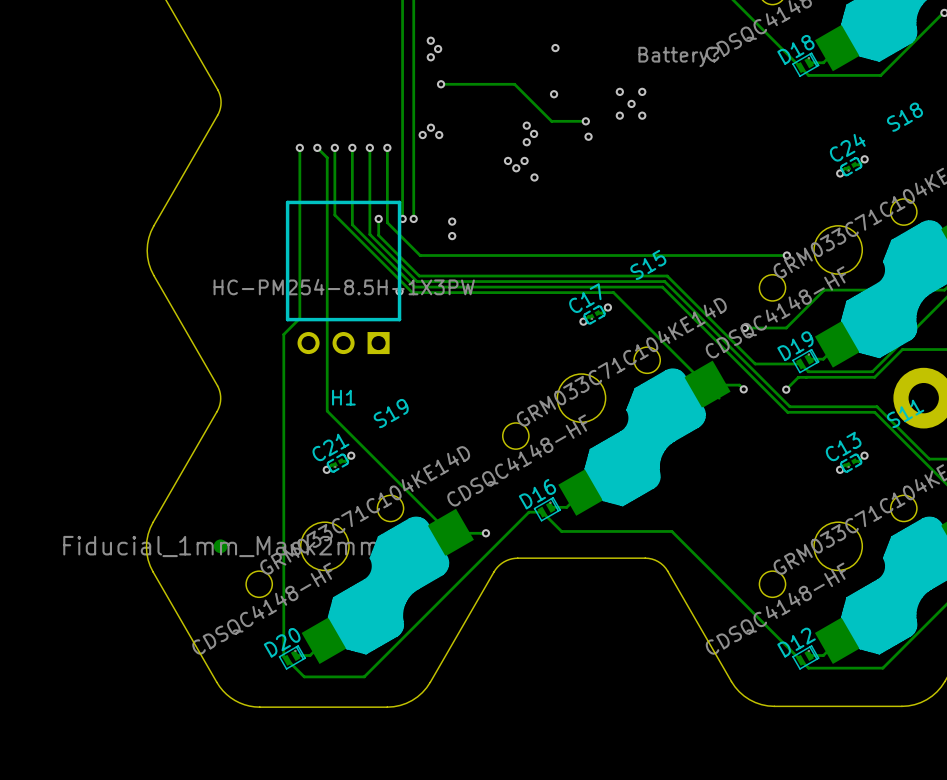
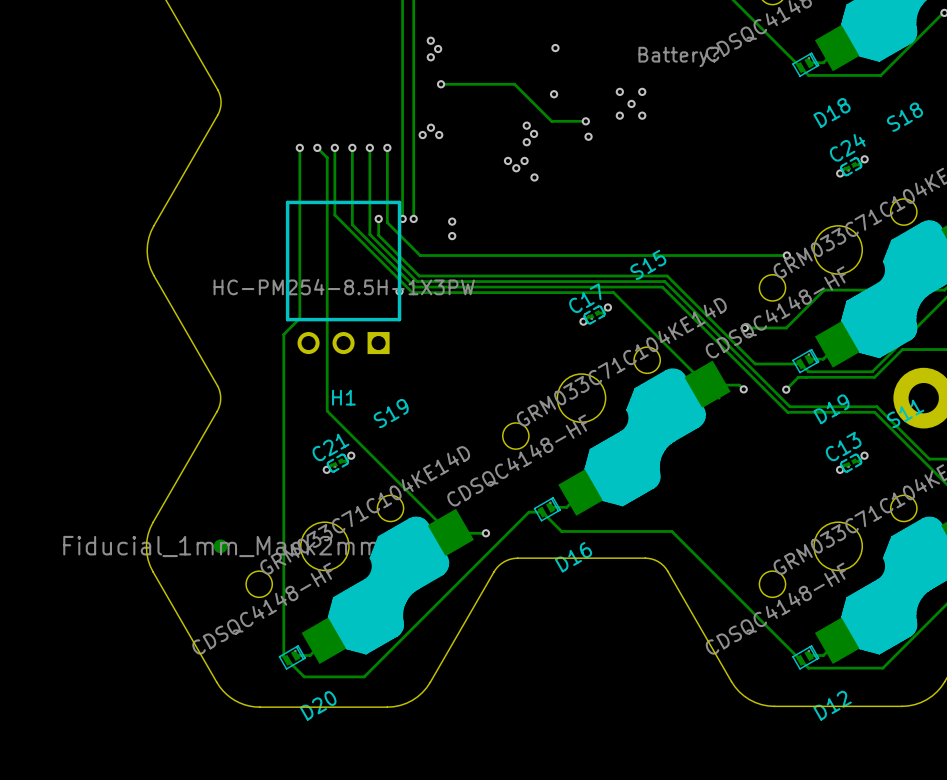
D18 name position: D18 (795, 49) -> D18 (831, 112)
D19 name position: D19 (795, 346) -> D19 (831, 409)
D16 name position: D16 (537, 494) -> D16 (573, 557)
D20 name position: D20 (282, 642) -> D20 (318, 705)
D12 name position: D12 (796, 642) -> D12 (832, 705)

